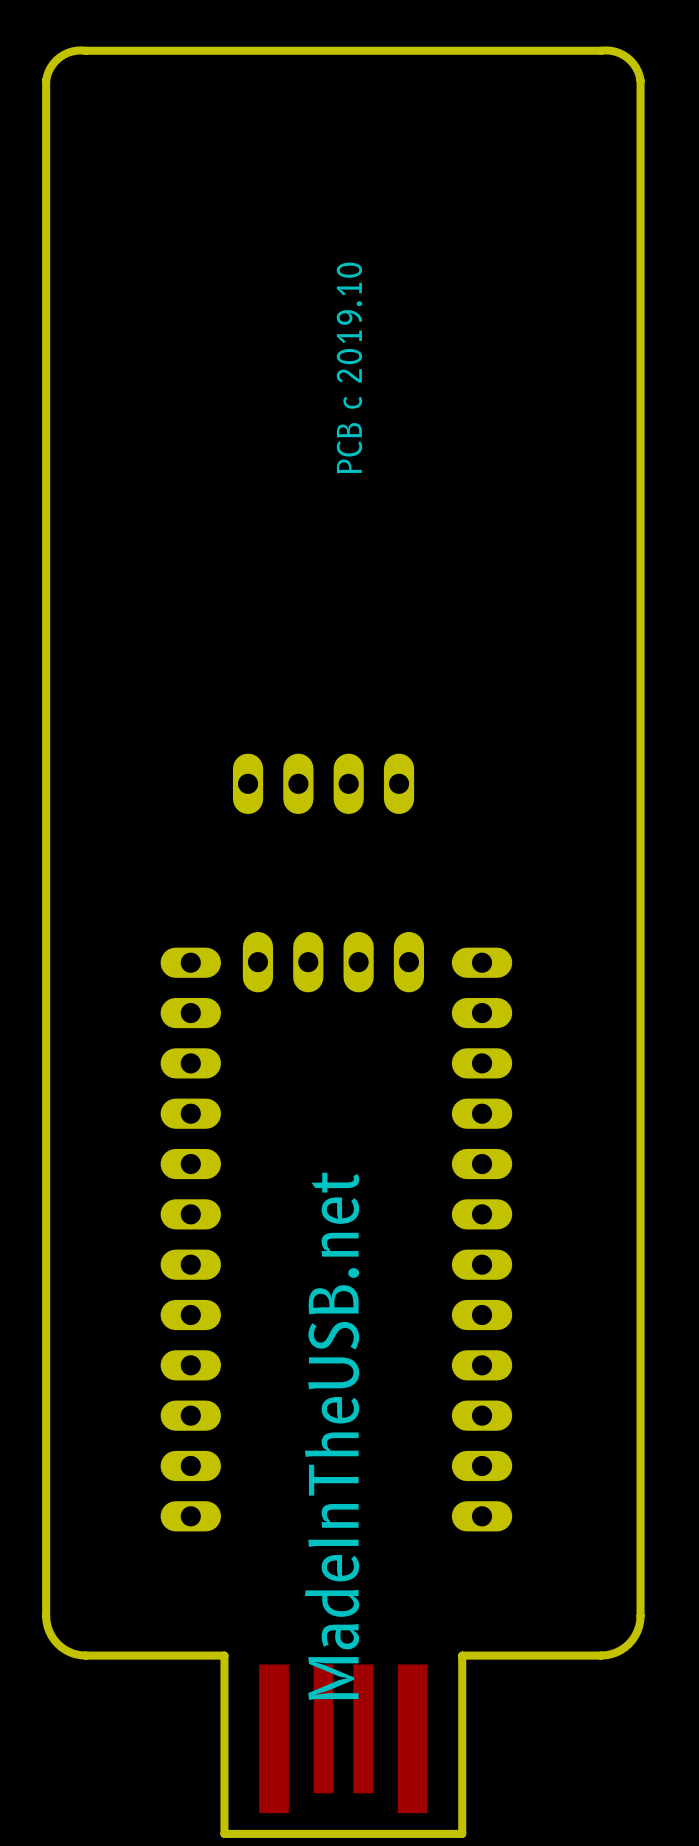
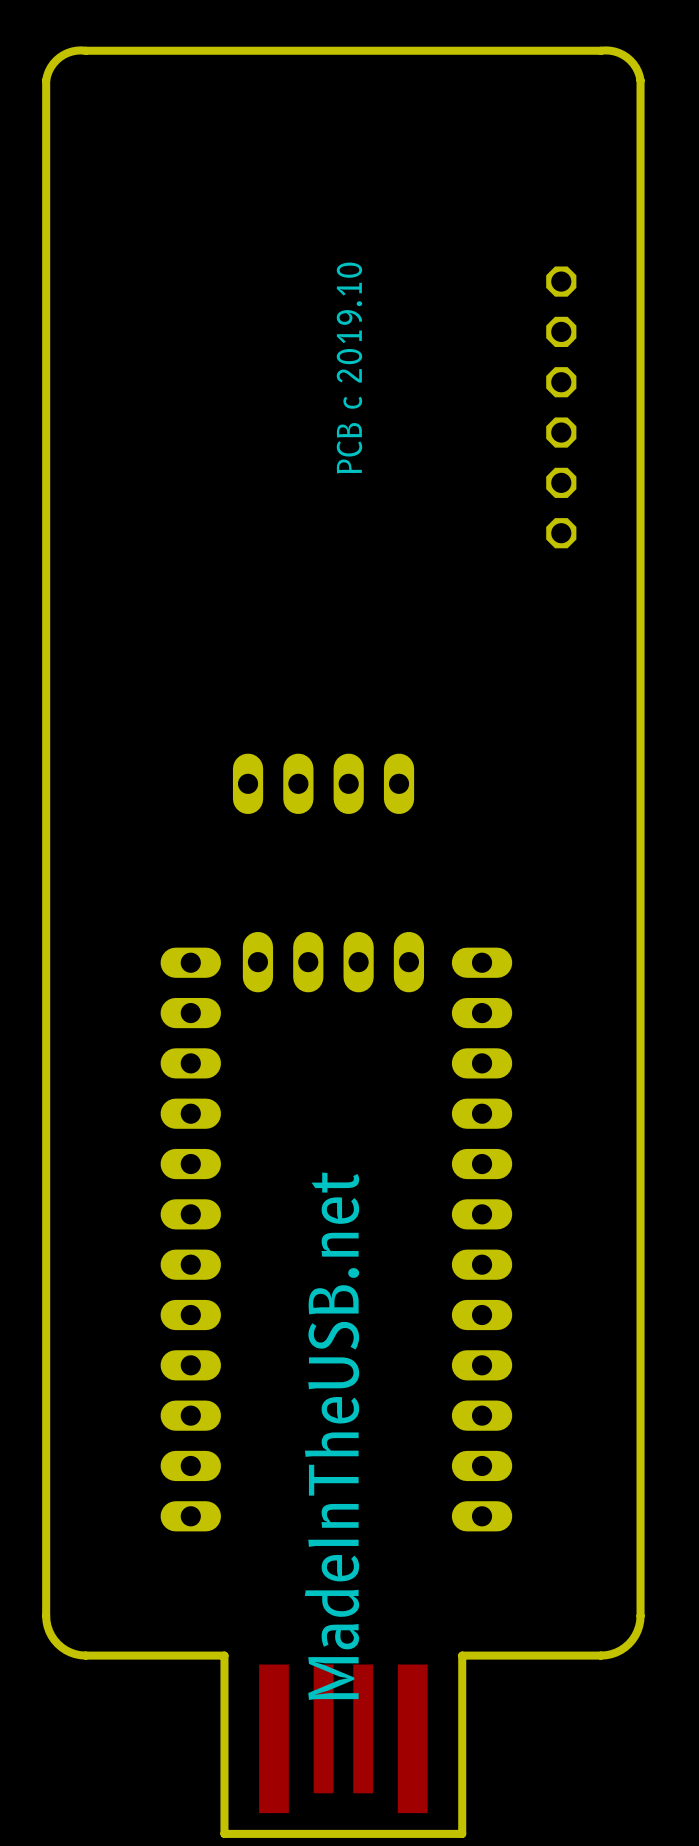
part: none -> (561, 407)

